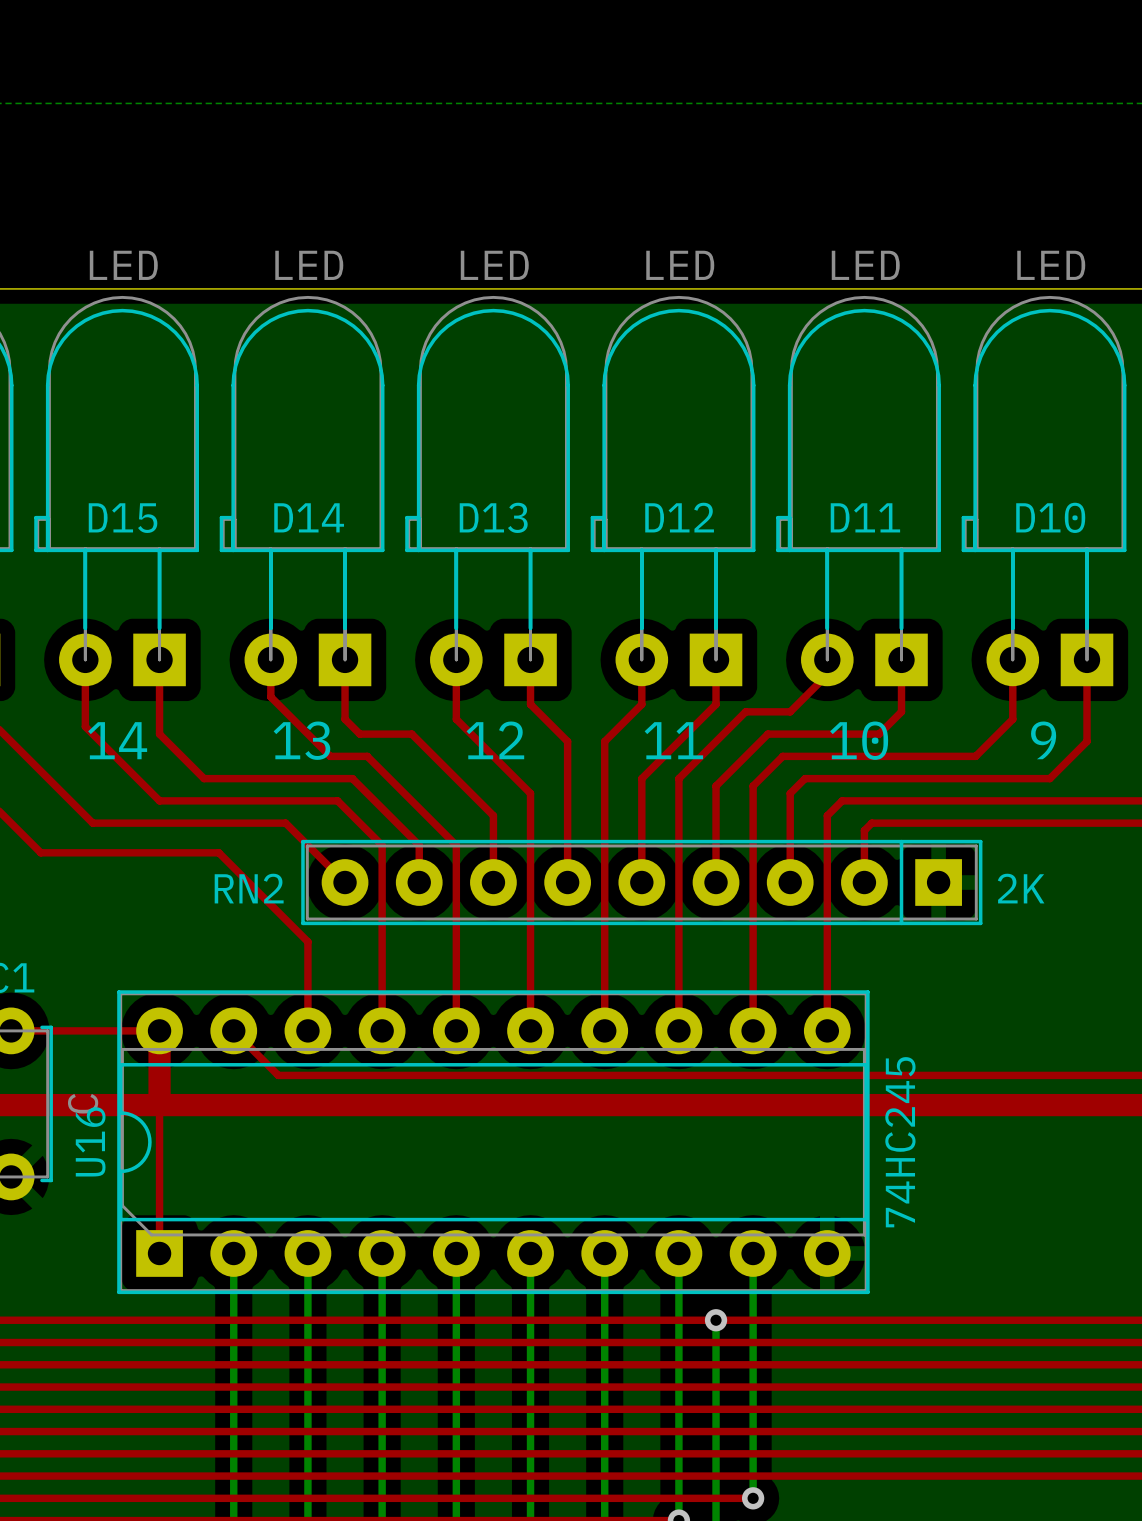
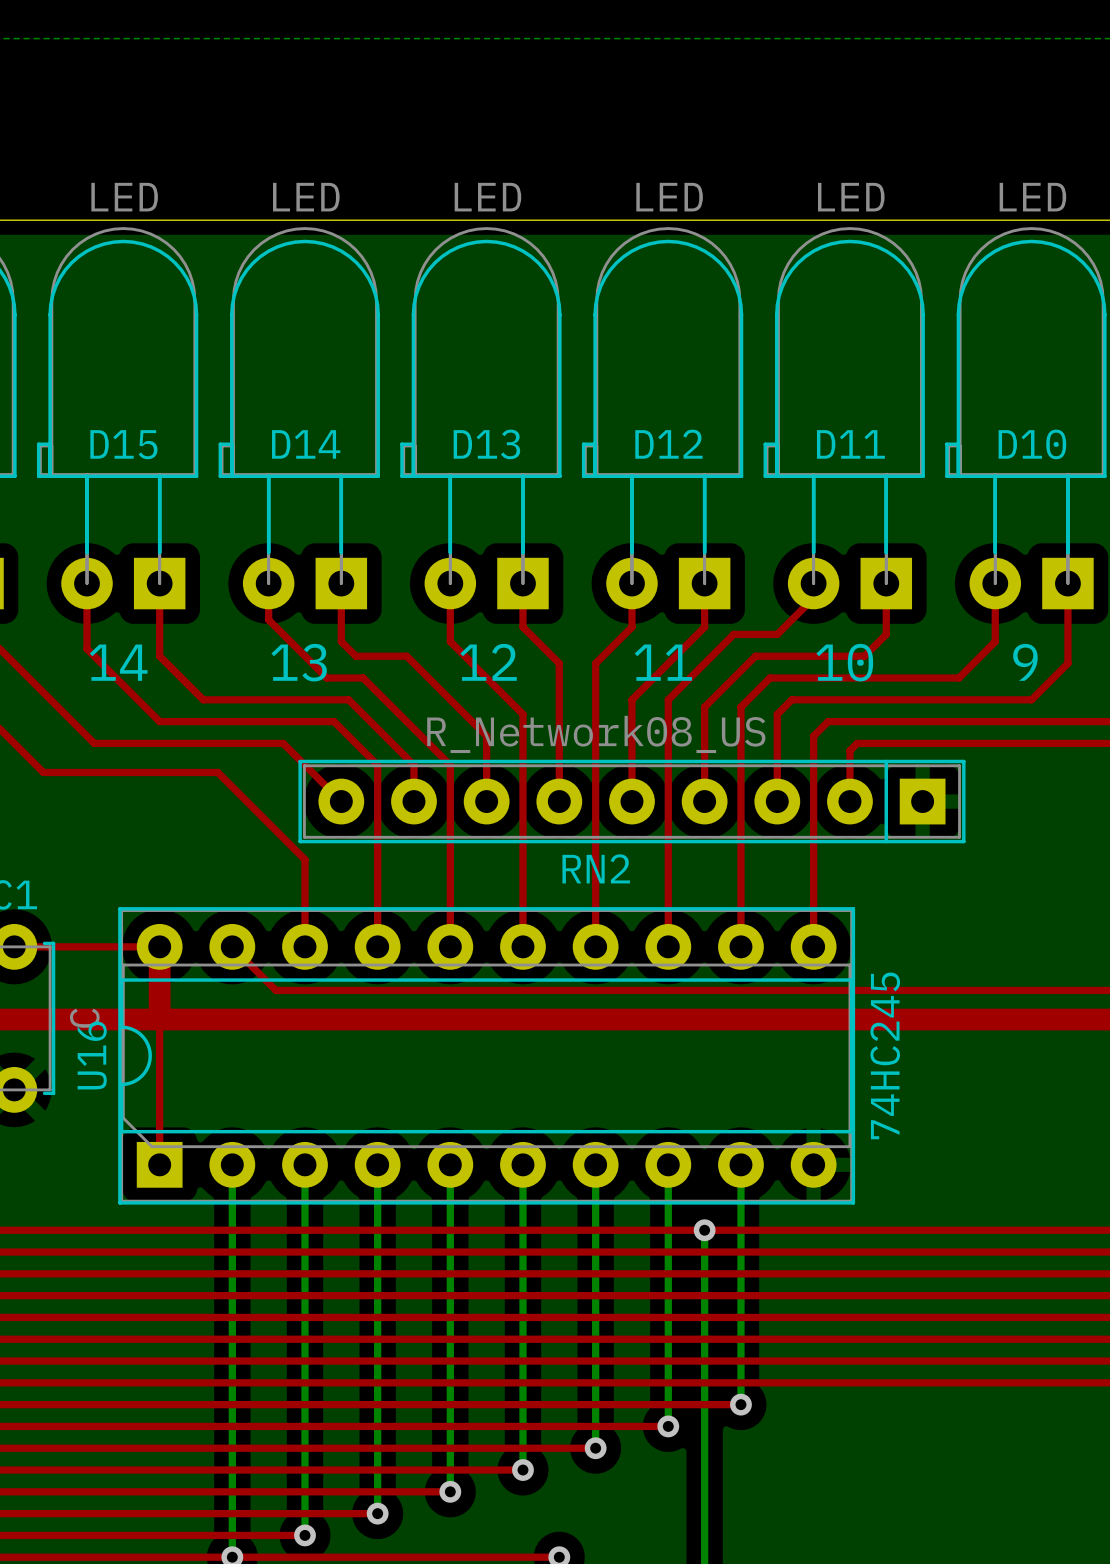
RN2 name position: RN2 (249, 888) -> RN2 (596, 868)
RN2 value: 2K (1021, 888) -> R_Network08_US (596, 734)

